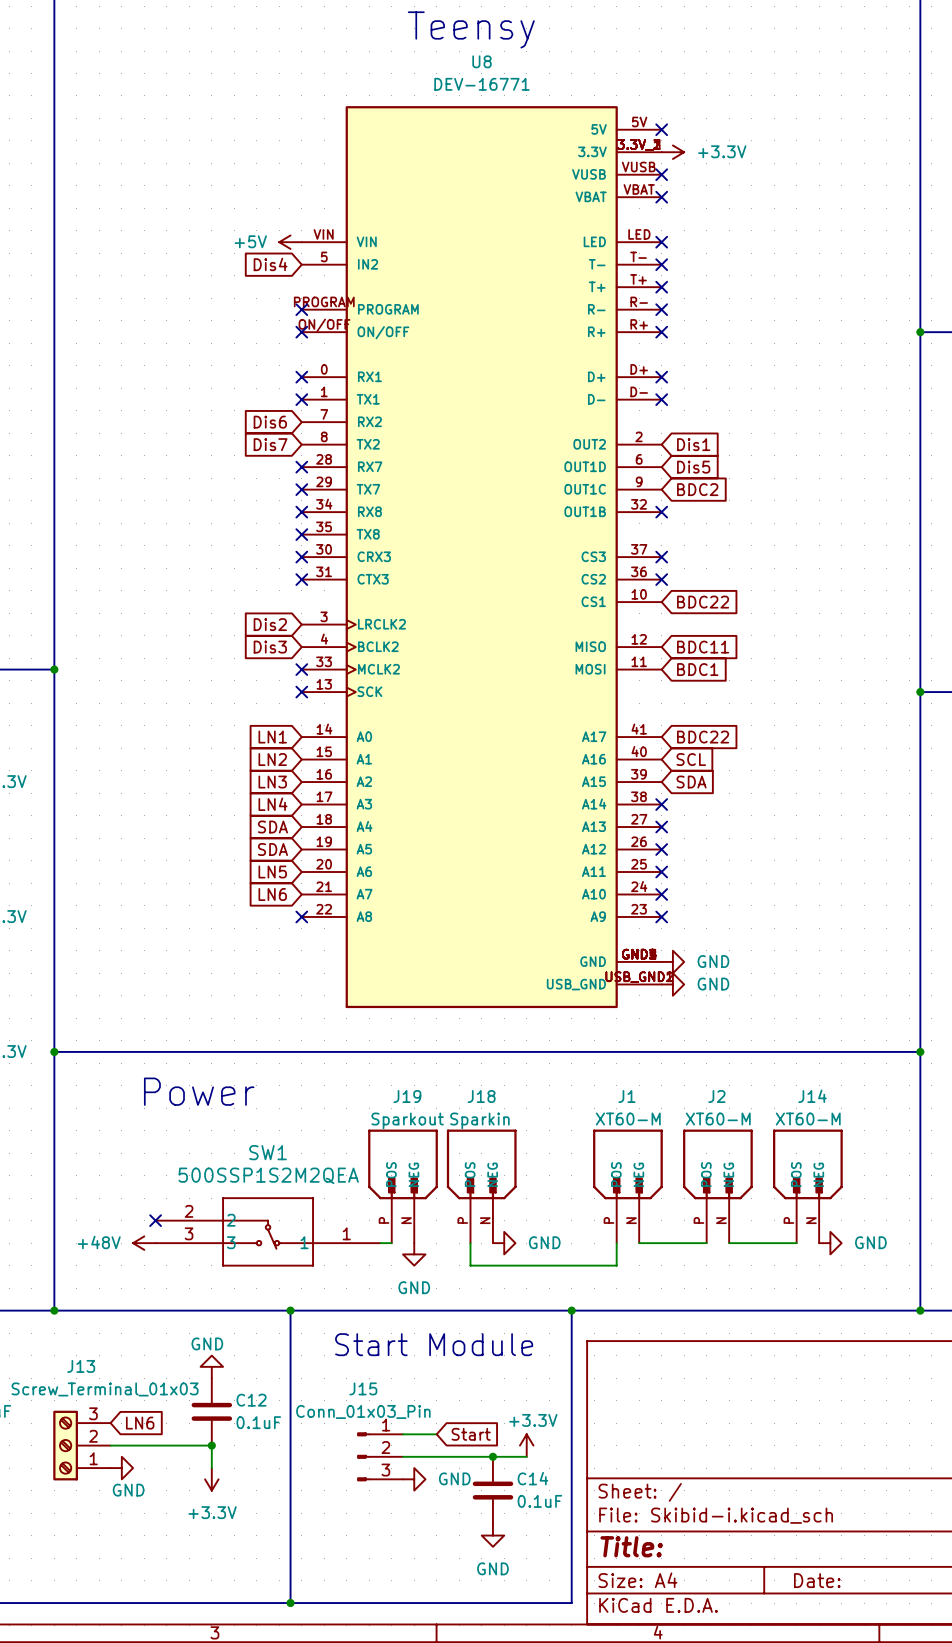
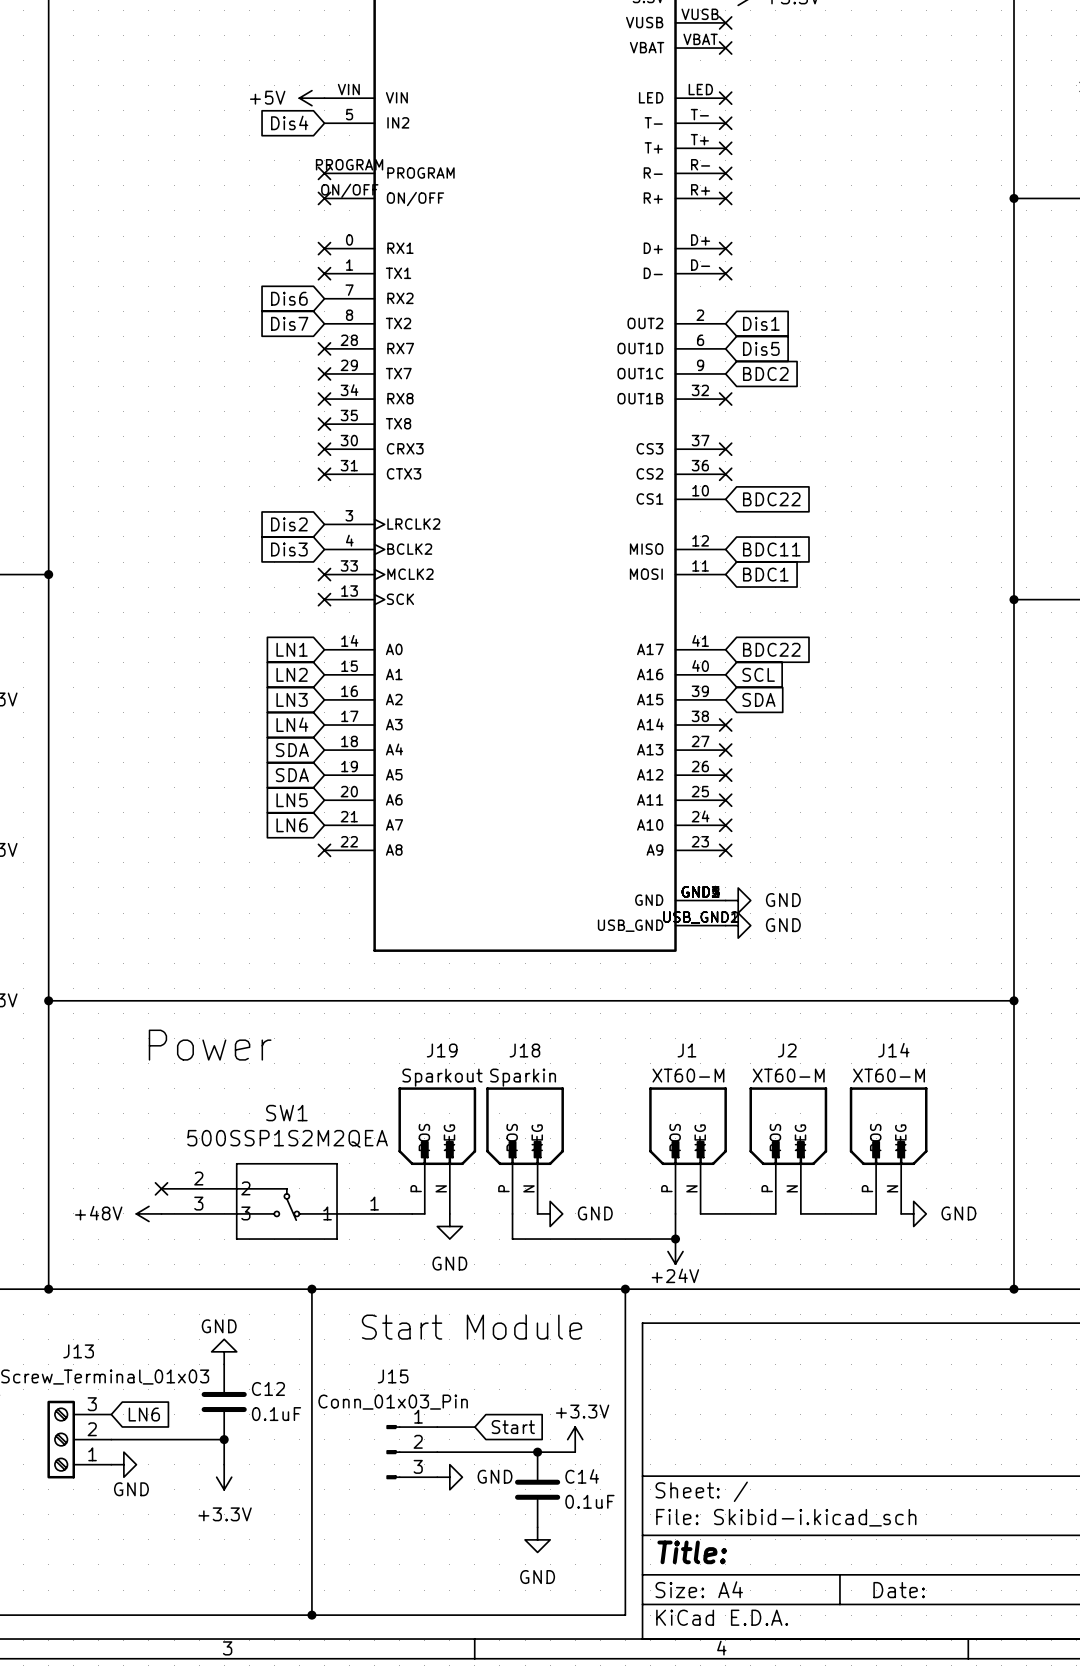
junction: none -> (675, 1239)
power symbol: none -> +24V (675, 1251)

